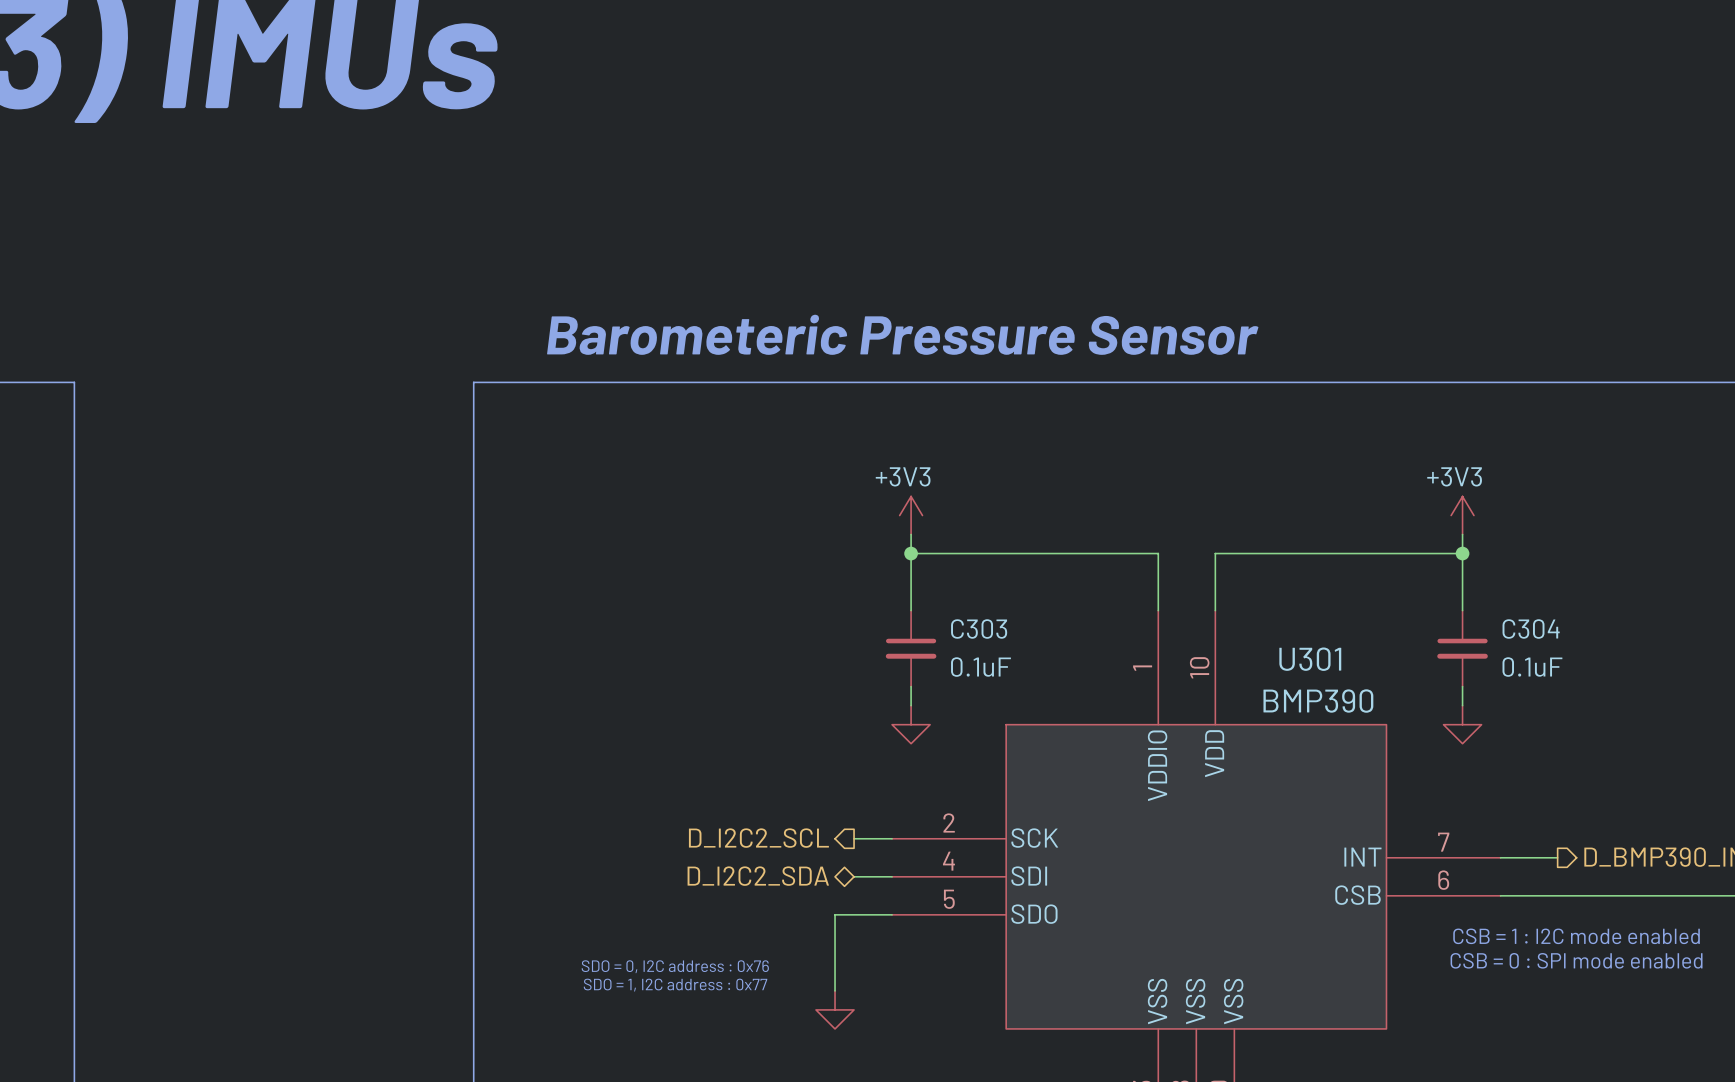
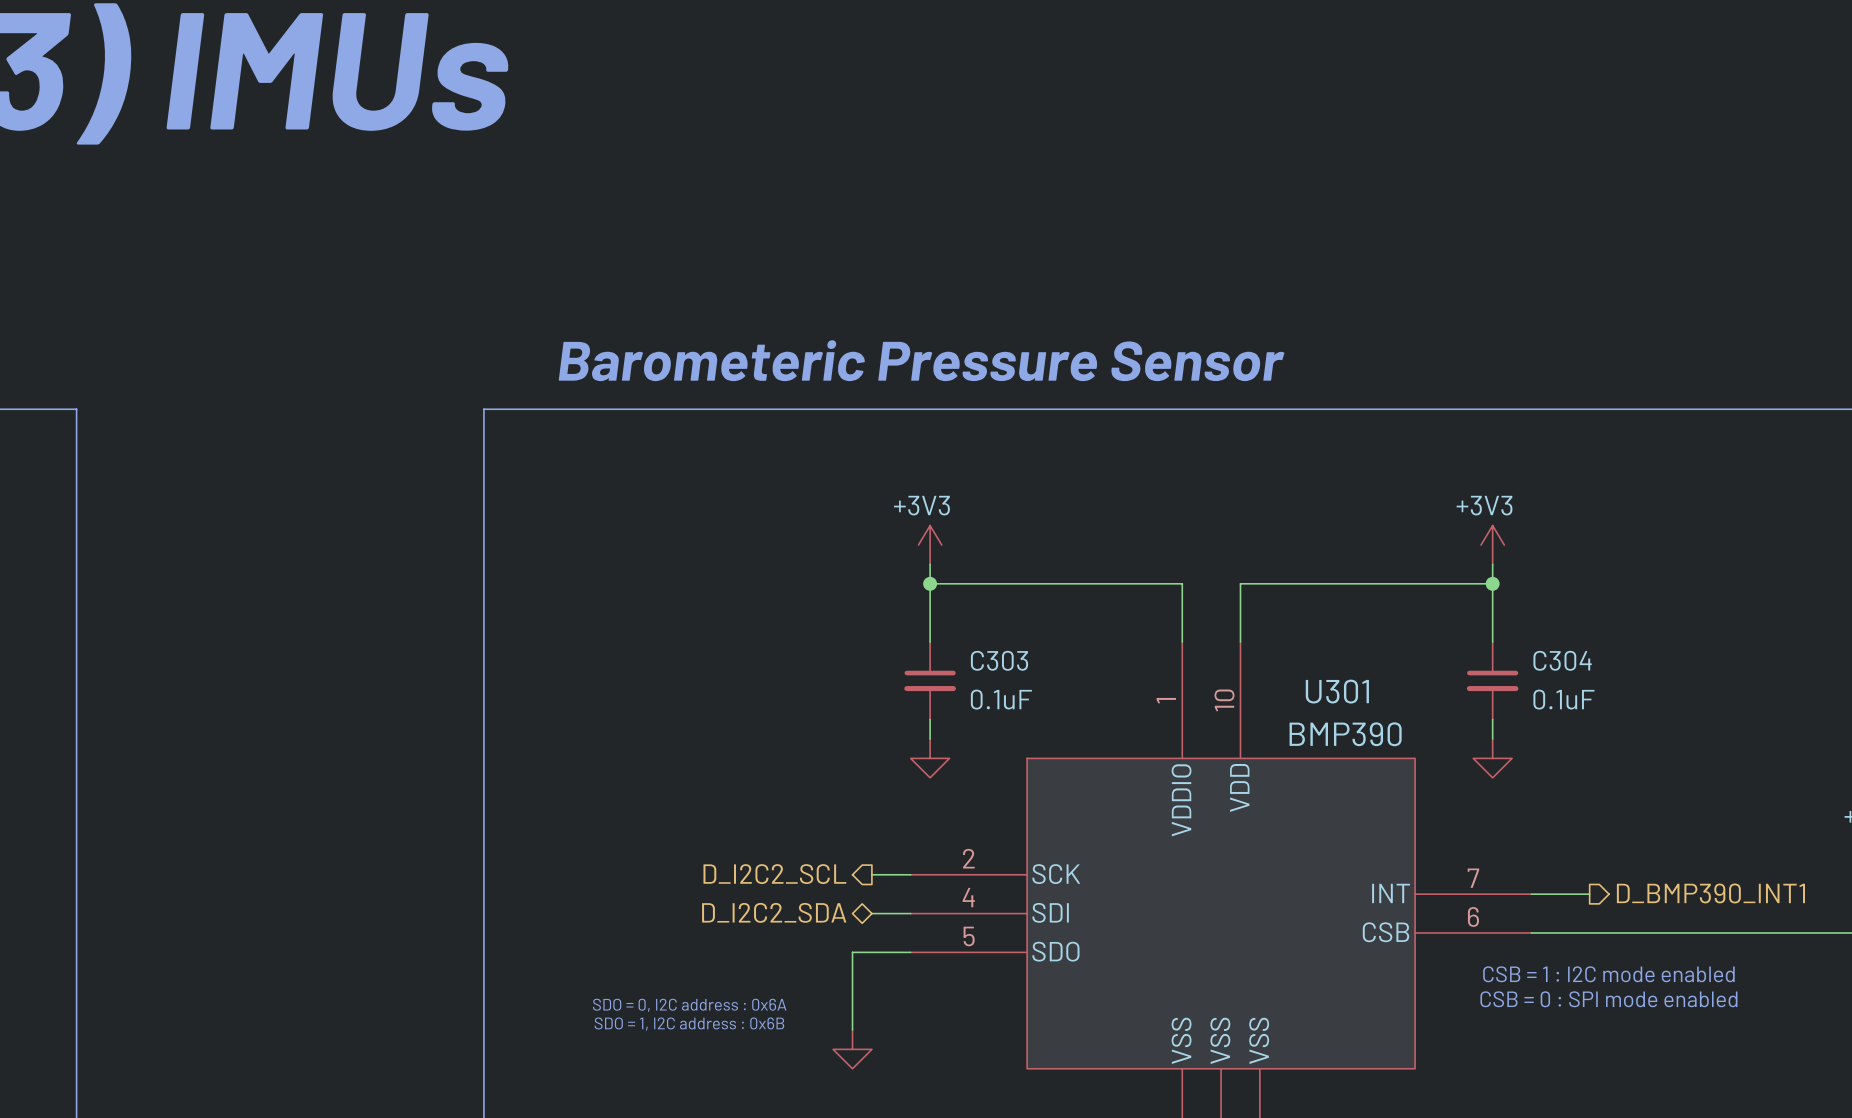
text: SDO = 0, I2C address : 0x76 (675, 966) -> SDO = 0, I2C address : 0x6A (689, 1005)
text: SDO = 1, I2C address : 0x77 (675, 985) -> SDO = 1, I2C address : 0x6B (689, 1024)

